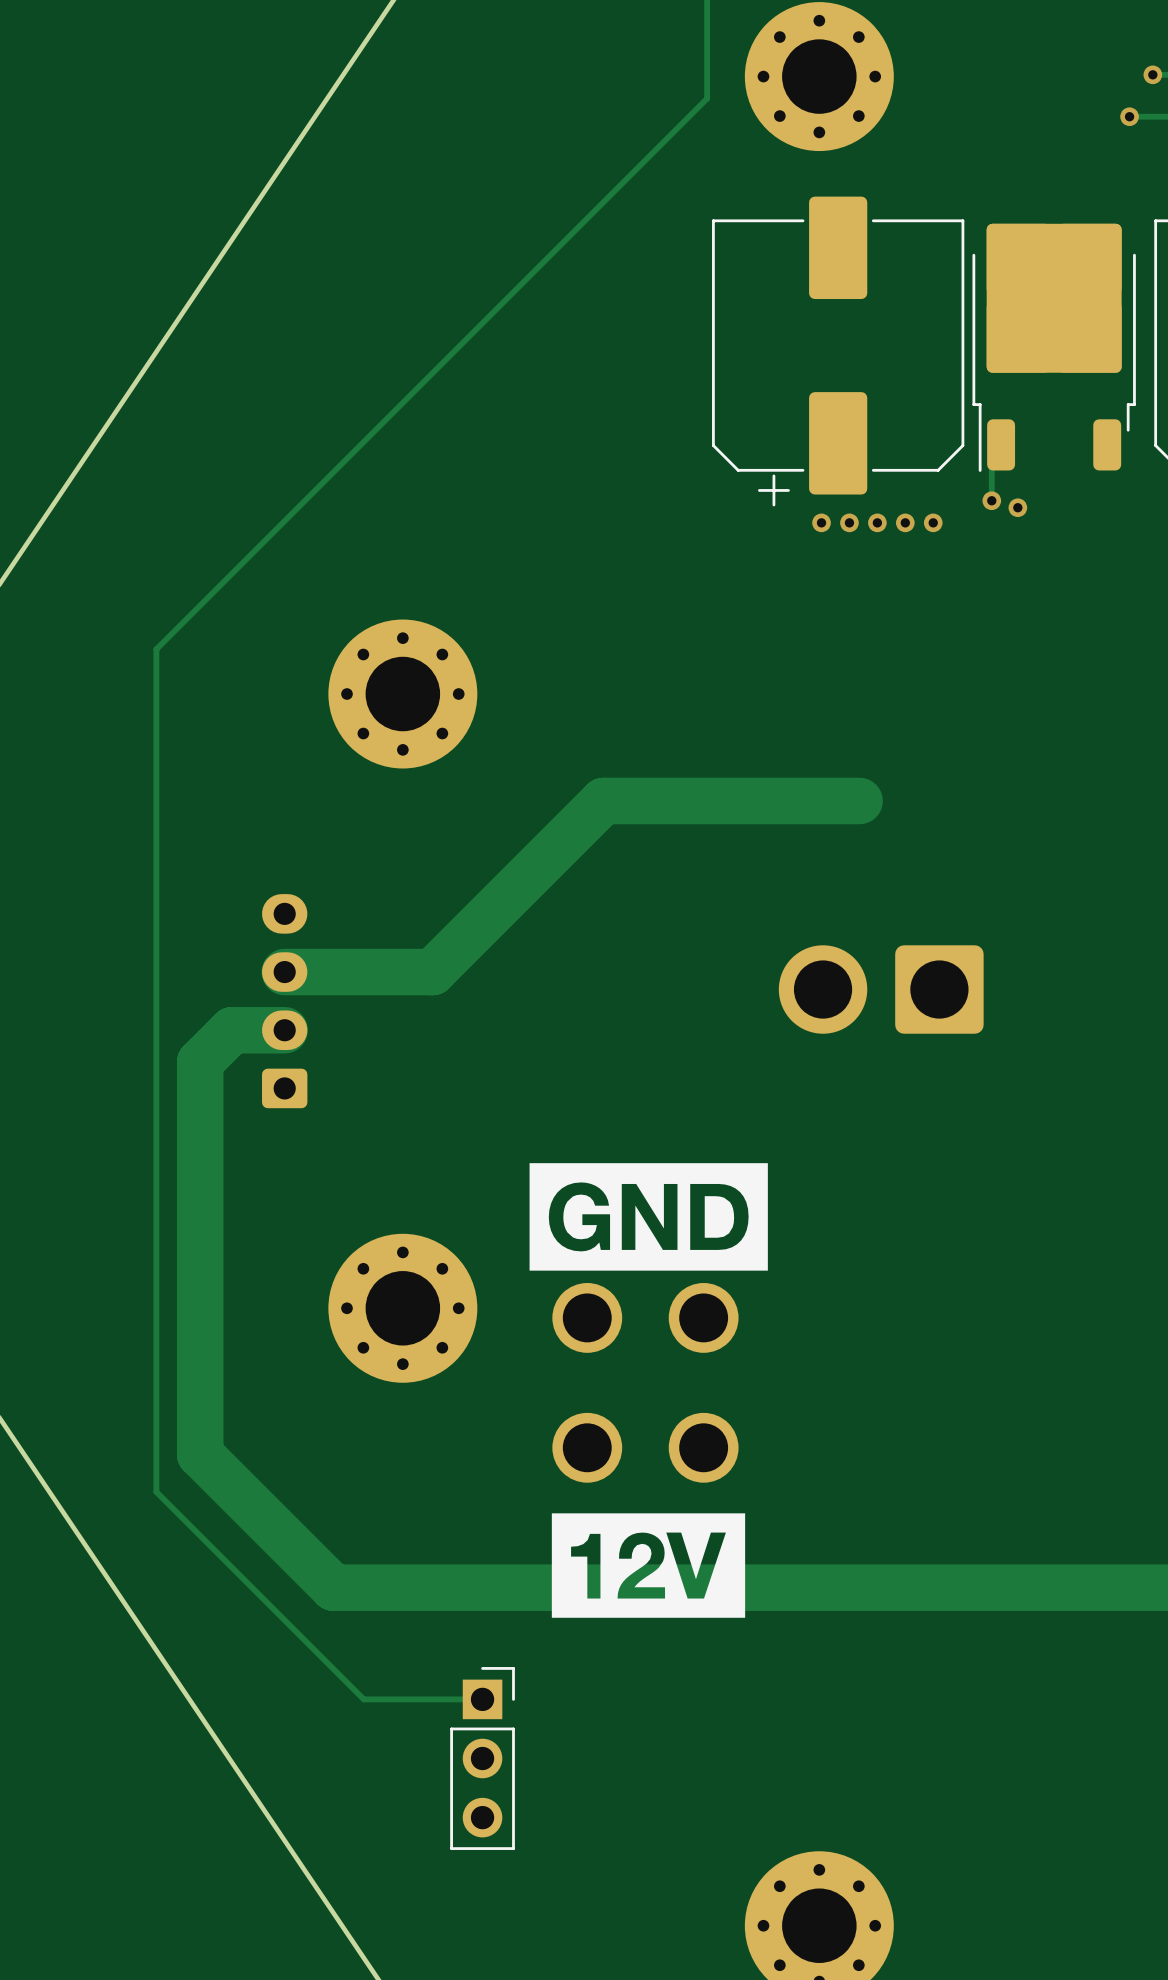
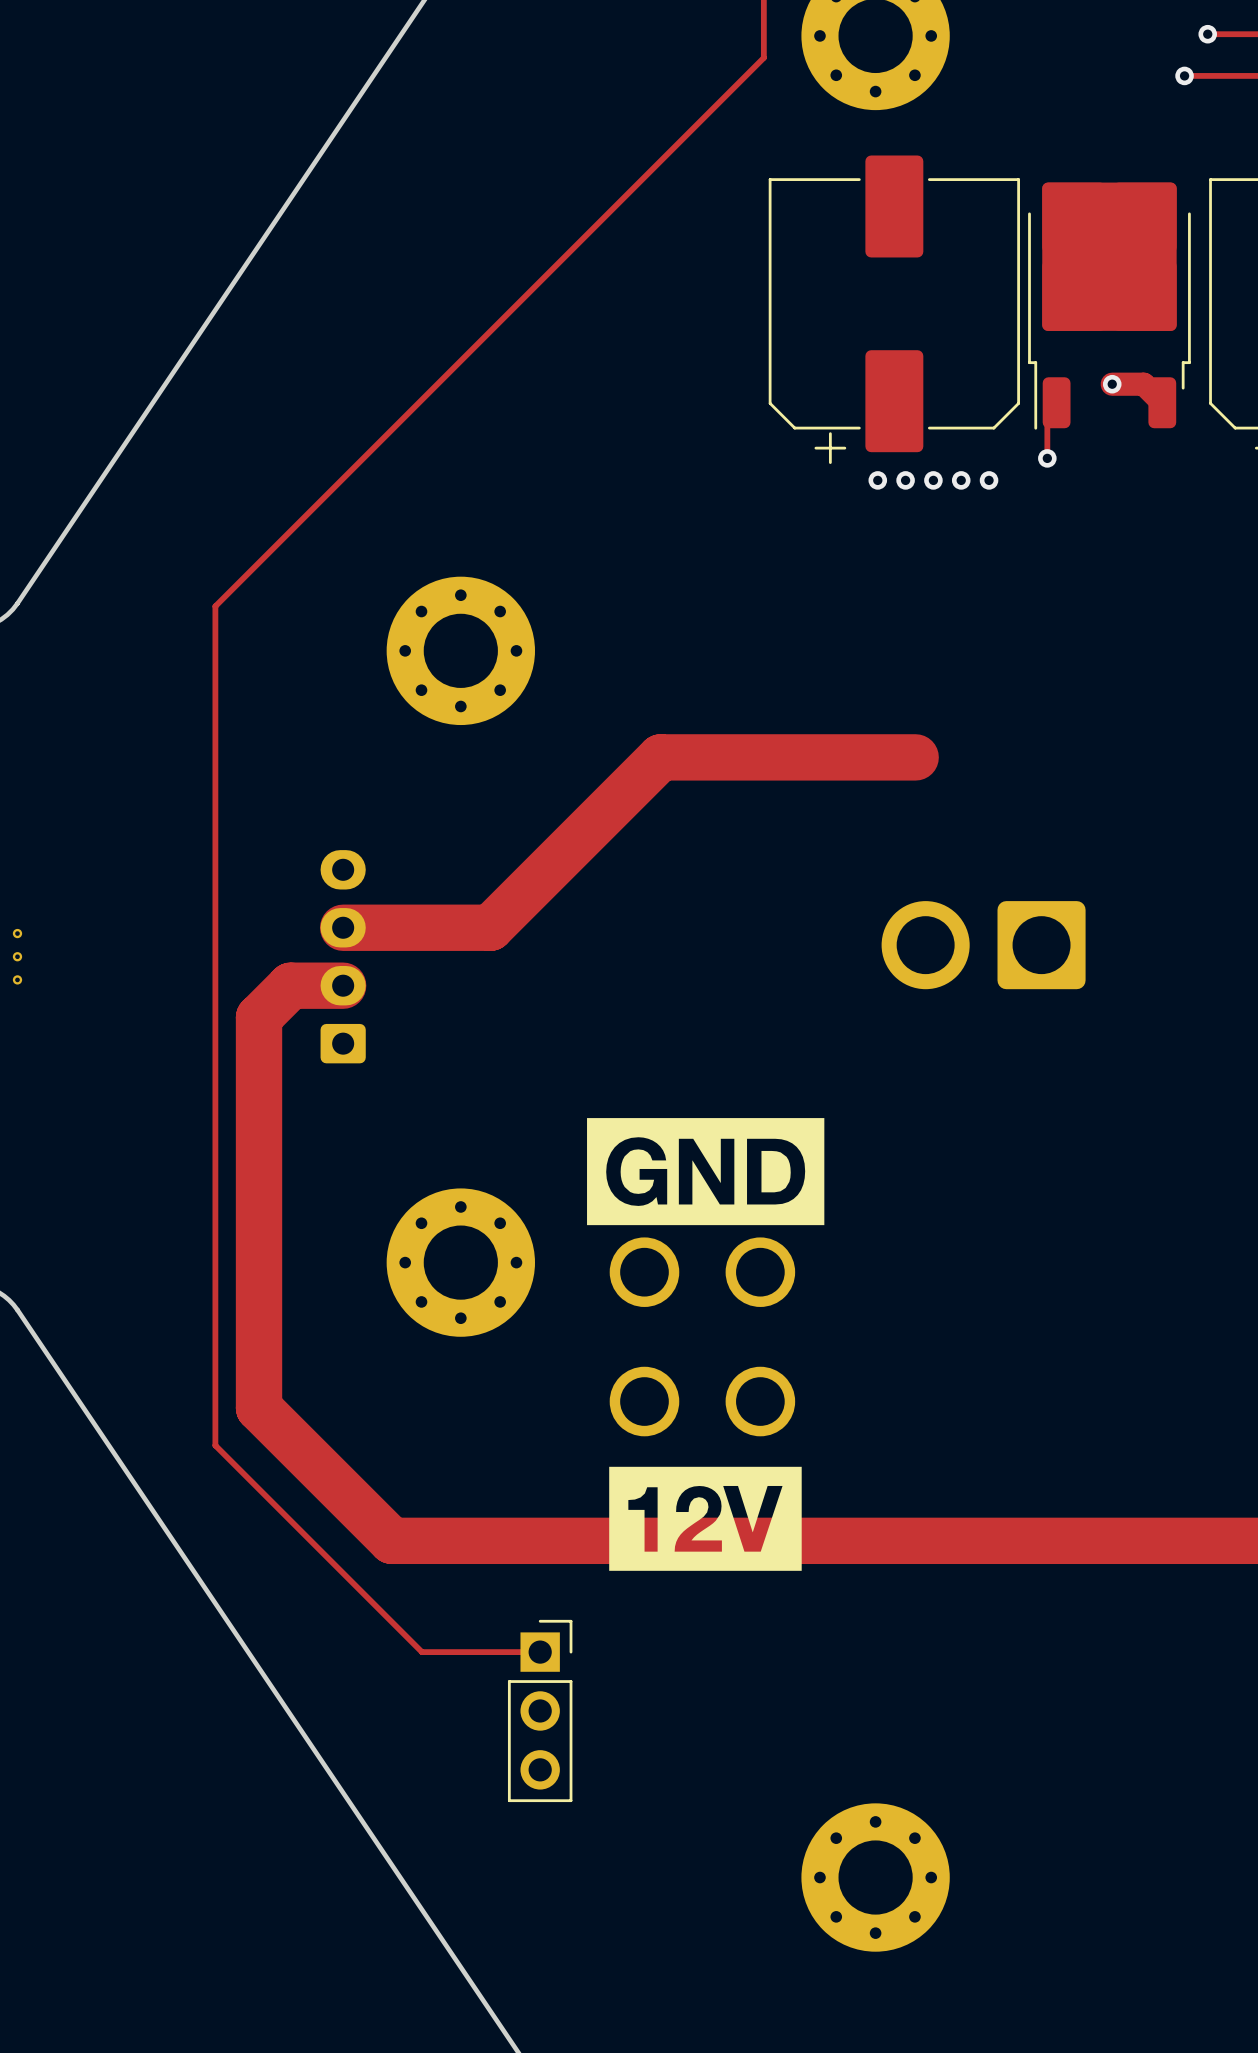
track: none -> (1112, 384) (1143, 384) (1162, 402)
via position: (1017, 507) -> (1112, 384)
part position: (881, 989) -> (983, 945)

